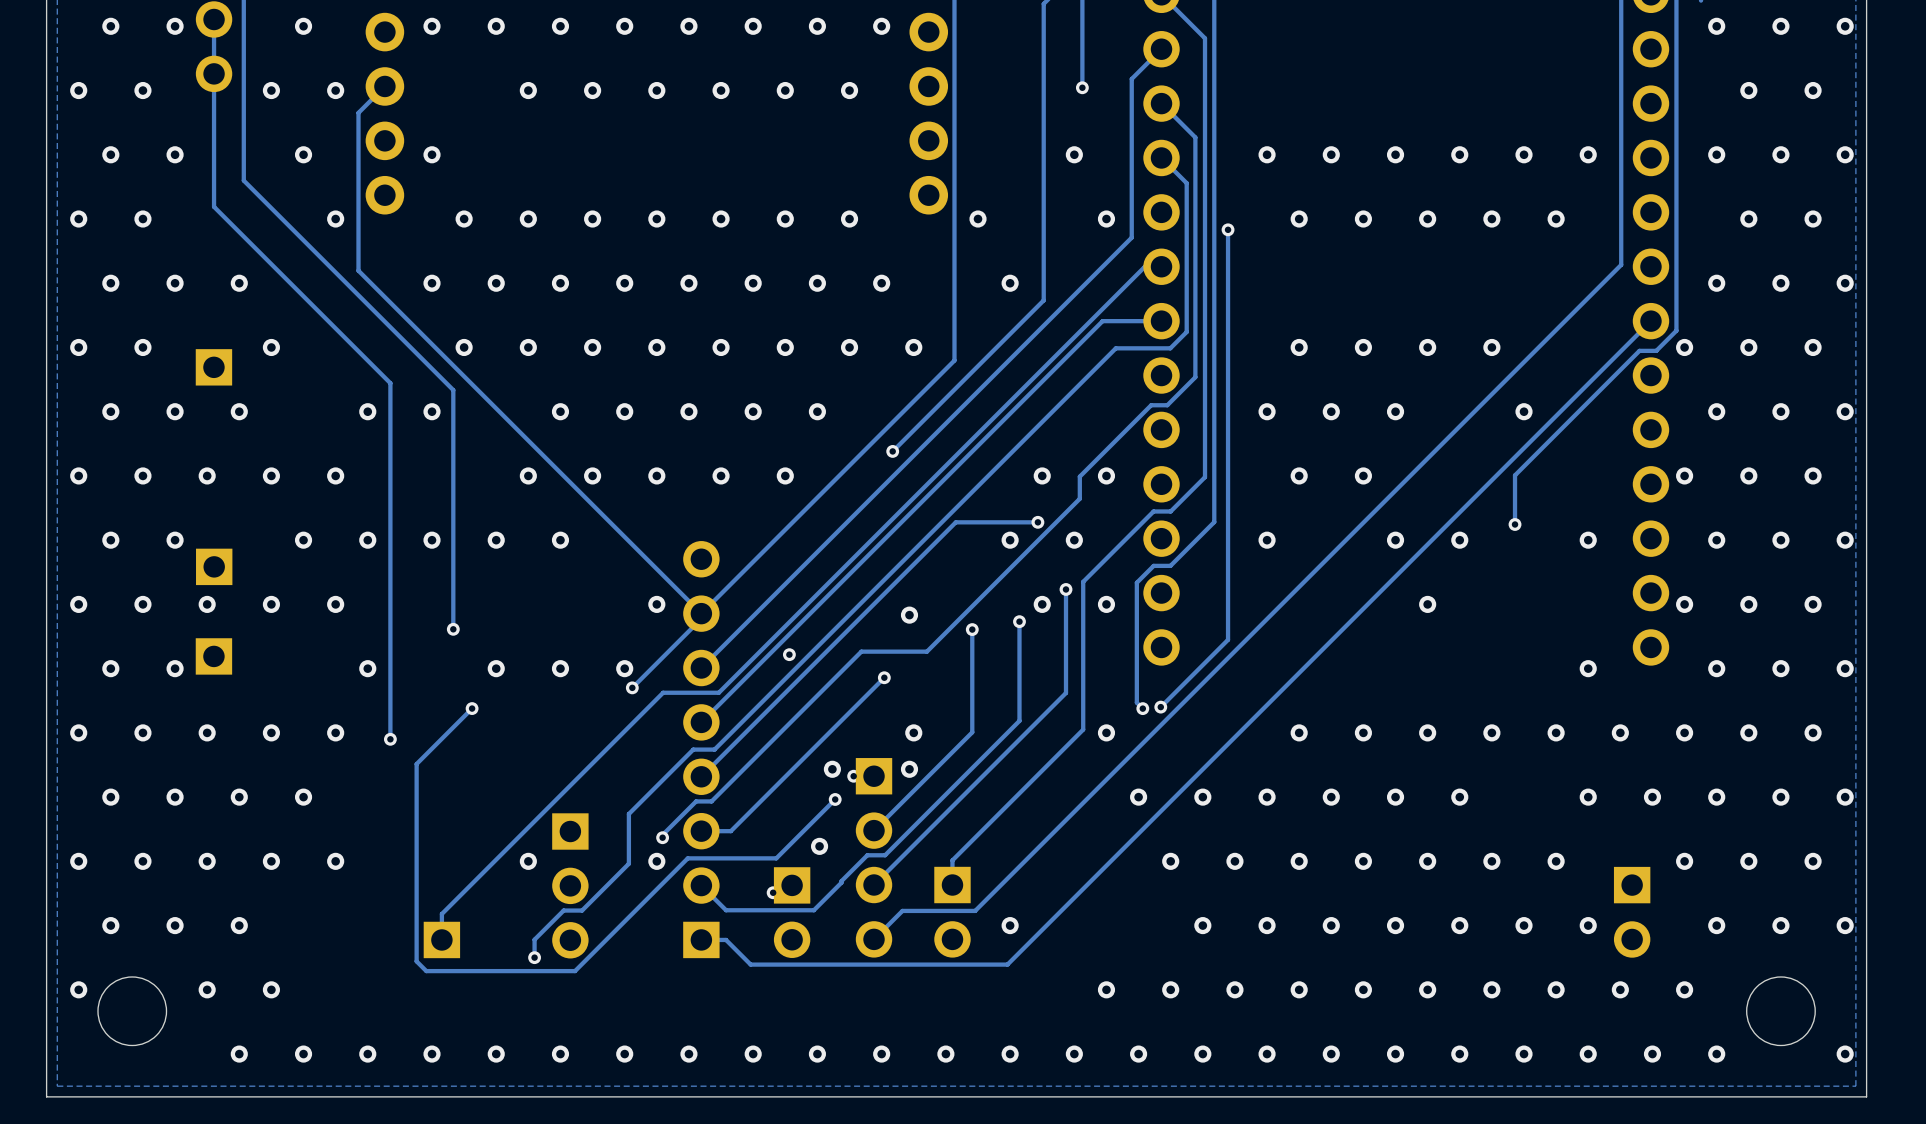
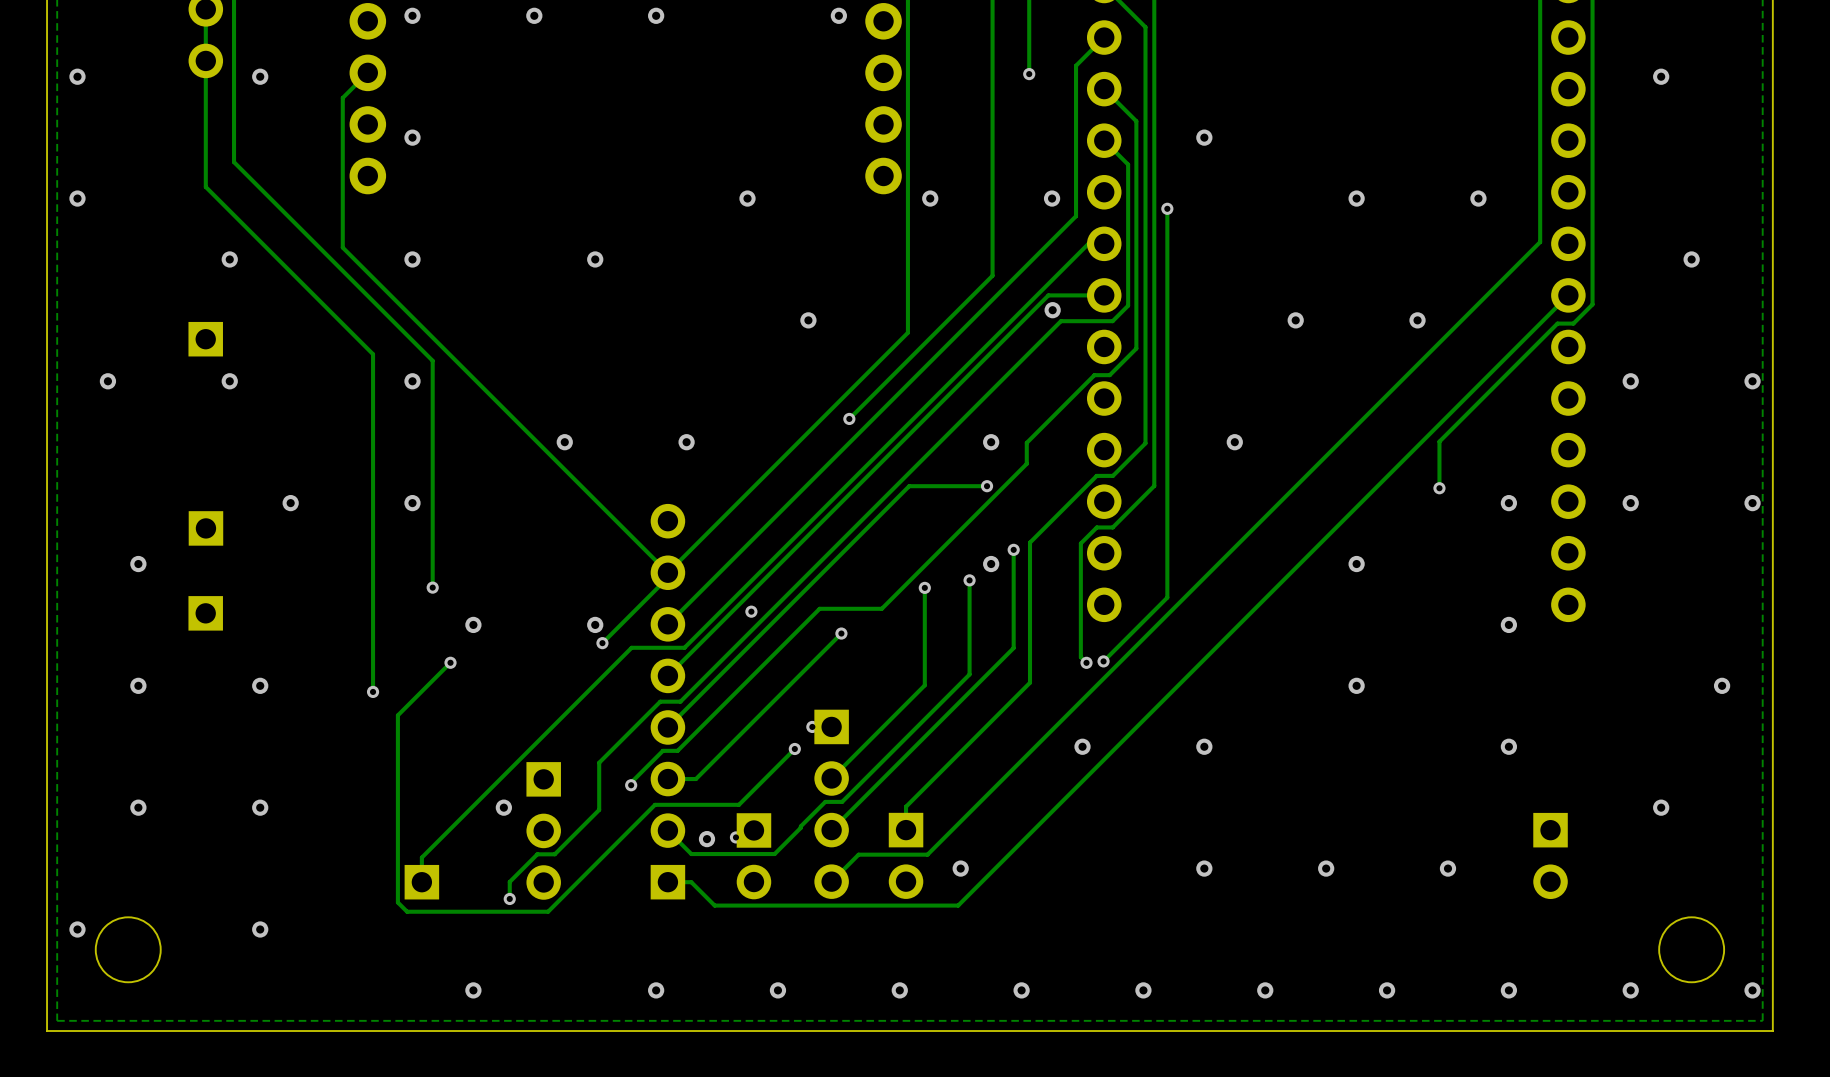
via: (110, 26) -> none
via: (175, 26) -> none
via: (303, 26) -> none
via: (496, 26) -> none
via: (624, 26) -> none
via: (753, 26) -> none
via: (817, 26) -> none
via: (1716, 26) -> none
via: (1780, 26) -> none
via: (1845, 26) -> none
via: (142, 90) -> none
via: (335, 90) -> none
via: (528, 90) -> none
via: (592, 90) -> none
via: (656, 90) -> none
via: (721, 90) -> none
via: (785, 90) -> none
via: (849, 90) -> none
via: (1813, 90) -> none
via: (110, 154) -> none
via: (175, 154) -> none
via: (303, 154) -> none
via: (1074, 154) -> none
via: (1331, 154) -> none
via: (1395, 154) -> none
via: (1459, 154) -> none
via: (1524, 154) -> none
via: (1588, 154) -> none
via: (1716, 154) -> none
via: (1780, 154) -> none
via: (1845, 154) -> none
via: (142, 219) -> none
via: (335, 219) -> none
via: (464, 219) -> none
via: (528, 219) -> none
via: (592, 219) -> none
via: (656, 219) -> none
via: (721, 219) -> none
via: (849, 219) -> none
via: (1299, 219) -> none
via: (1363, 219) -> none
via: (1491, 219) -> none
via: (1748, 219) -> none
via: (1813, 219) -> none
via: (110, 283) -> none
via: (175, 283) -> none
via: (496, 283) -> none
via: (560, 283) -> none
via: (688, 283) -> none
via: (753, 283) -> none
via: (817, 283) -> none
via: (881, 283) -> none
via: (1010, 283) -> none
via: (1716, 283) -> none
via: (1845, 283) -> none
via: none -> (1052, 310)
via: (78, 347) -> none
via: (142, 347) -> none
via: (271, 347) -> none
via: (464, 347) -> none
via: (528, 347) -> none
via: (592, 347) -> none
via: (656, 347) -> none
via: (721, 347) -> none
via: (785, 347) -> none
via: (913, 347) -> none
via: (1299, 347) -> none
via: (1427, 347) -> none
via: (1684, 347) -> none
via: (1748, 347) -> none
via: (1813, 347) -> none
via: (175, 411) -> none
via: (367, 411) -> none
via: (560, 411) -> none
via: (624, 411) -> none
via: (688, 411) -> none
via: (753, 411) -> none
via: (817, 411) -> none
via: (1267, 411) -> none
via: (1331, 411) -> none
via: (1395, 411) -> none
via: (1524, 411) -> none
via: (1780, 411) -> none
via: (78, 475) -> none
via: (142, 475) -> none
via: (207, 475) -> none
via: (271, 475) -> none
via: (335, 475) -> none
via: (528, 475) -> none
via: (656, 475) -> none
via: (785, 475) -> none
via: (1106, 475) -> none
via: (1363, 475) -> none
via: (1684, 475) -> none
via: (1748, 475) -> none
via: (1813, 475) -> none
via: (110, 540) -> none
via: (175, 540) -> none
via: (367, 540) -> none
via: (496, 540) -> none
via: (560, 540) -> none
via: (1010, 540) -> none
via: (1074, 540) -> none
via: (1267, 540) -> none
via: (1395, 540) -> none
via: (1459, 540) -> none
via: (1780, 540) -> none
via: (78, 604) -> none
via: (207, 604) -> none
via: (271, 604) -> none
via: (335, 604) -> none
via: (656, 604) -> none
via: (1106, 604) -> none
via: (1684, 604) -> none
via: (1748, 604) -> none
via: (1813, 604) -> none
via: (909, 615) -> none
via: (110, 668) -> none
via: (175, 668) -> none
via: (367, 668) -> none
via: (560, 668) -> none
via: (1716, 668) -> none
via: (1780, 668) -> none
via: (1845, 668) -> none
via: (78, 732) -> none
via: (207, 732) -> none
via: (335, 732) -> none
via: (913, 732) -> none
via: (1106, 732) -> none
via: (1299, 732) -> none
via: (1363, 732) -> none
via: (1491, 732) -> none
via: (1556, 732) -> none
via: (1620, 732) -> none
via: (1684, 732) -> none
via: (1748, 732) -> none
via: (832, 769) -> none
via: (909, 769) -> none
via: (110, 797) -> none
via: (175, 797) -> none
via: (239, 797) -> none
via: (303, 797) -> none
via: (1202, 797) -> none
via: (1331, 797) -> none
via: (1395, 797) -> none
via: (1459, 797) -> none
via: (1652, 797) -> none
via: (1716, 797) -> none
via: (1780, 797) -> none
via: (1845, 797) -> none
via: (819, 846) -> none
via: (78, 861) -> none
via: (207, 861) -> none
via: (335, 861) -> none
via: (656, 861) -> none
via: (1170, 861) -> none
via: (1234, 861) -> none
via: (1299, 861) -> none
via: (1363, 861) -> none
via: (1427, 861) -> none
via: (1491, 861) -> none
via: (1556, 861) -> none
via: (1684, 861) -> none
via: (1813, 861) -> none
via: none -> (707, 839)
via: (110, 925) -> none
via: (175, 925) -> none
via: (239, 925) -> none
via: (1202, 925) -> none
via: (1331, 925) -> none
via: (1459, 925) -> none
via: (1588, 925) -> none
via: (1716, 925) -> none
via: (1780, 925) -> none
via: (1845, 925) -> none
via: (207, 989) -> none
via: (1106, 989) -> none
via: (1170, 989) -> none
via: (1234, 989) -> none
via: (1299, 989) -> none
via: (1363, 989) -> none
via: (1427, 989) -> none
via: (1491, 989) -> none
via: (1556, 989) -> none
via: (1620, 989) -> none
via: (1684, 989) -> none
via: (239, 1054) -> none
via: (303, 1054) -> none
via: (367, 1054) -> none
via: (432, 1054) -> none
via: (560, 1054) -> none
via: (624, 1054) -> none
via: (753, 1054) -> none
via: (881, 1054) -> none
via: (1010, 1054) -> none
via: (1138, 1054) -> none
via: (1267, 1054) -> none
via: (1395, 1054) -> none
via: (1524, 1054) -> none
via: (1652, 1054) -> none

